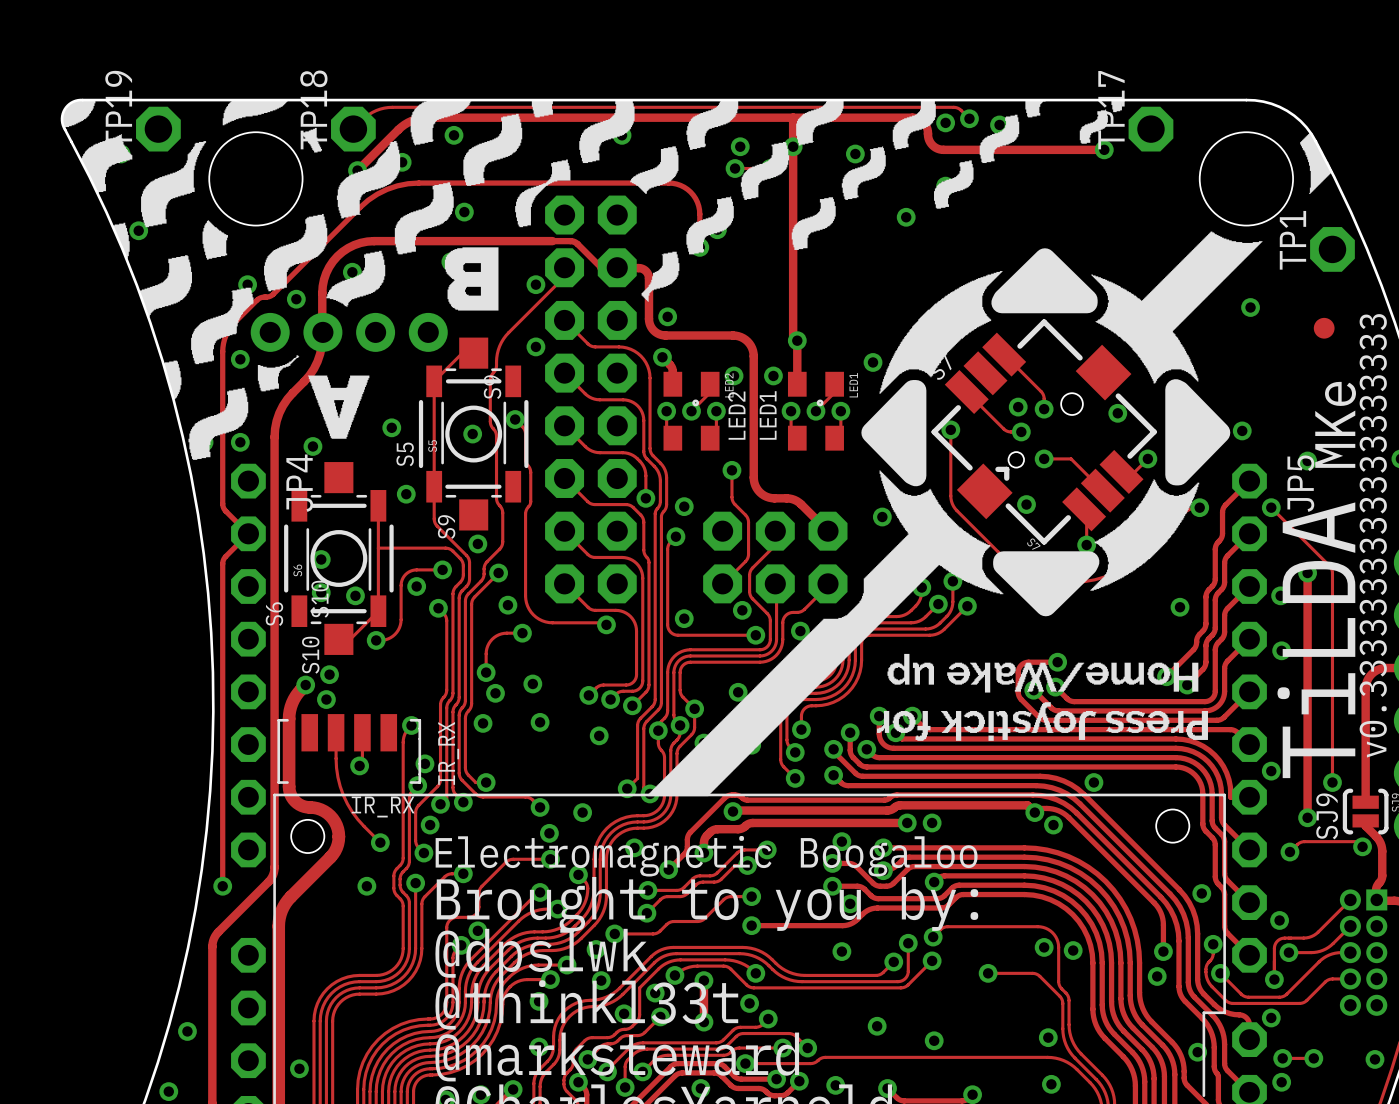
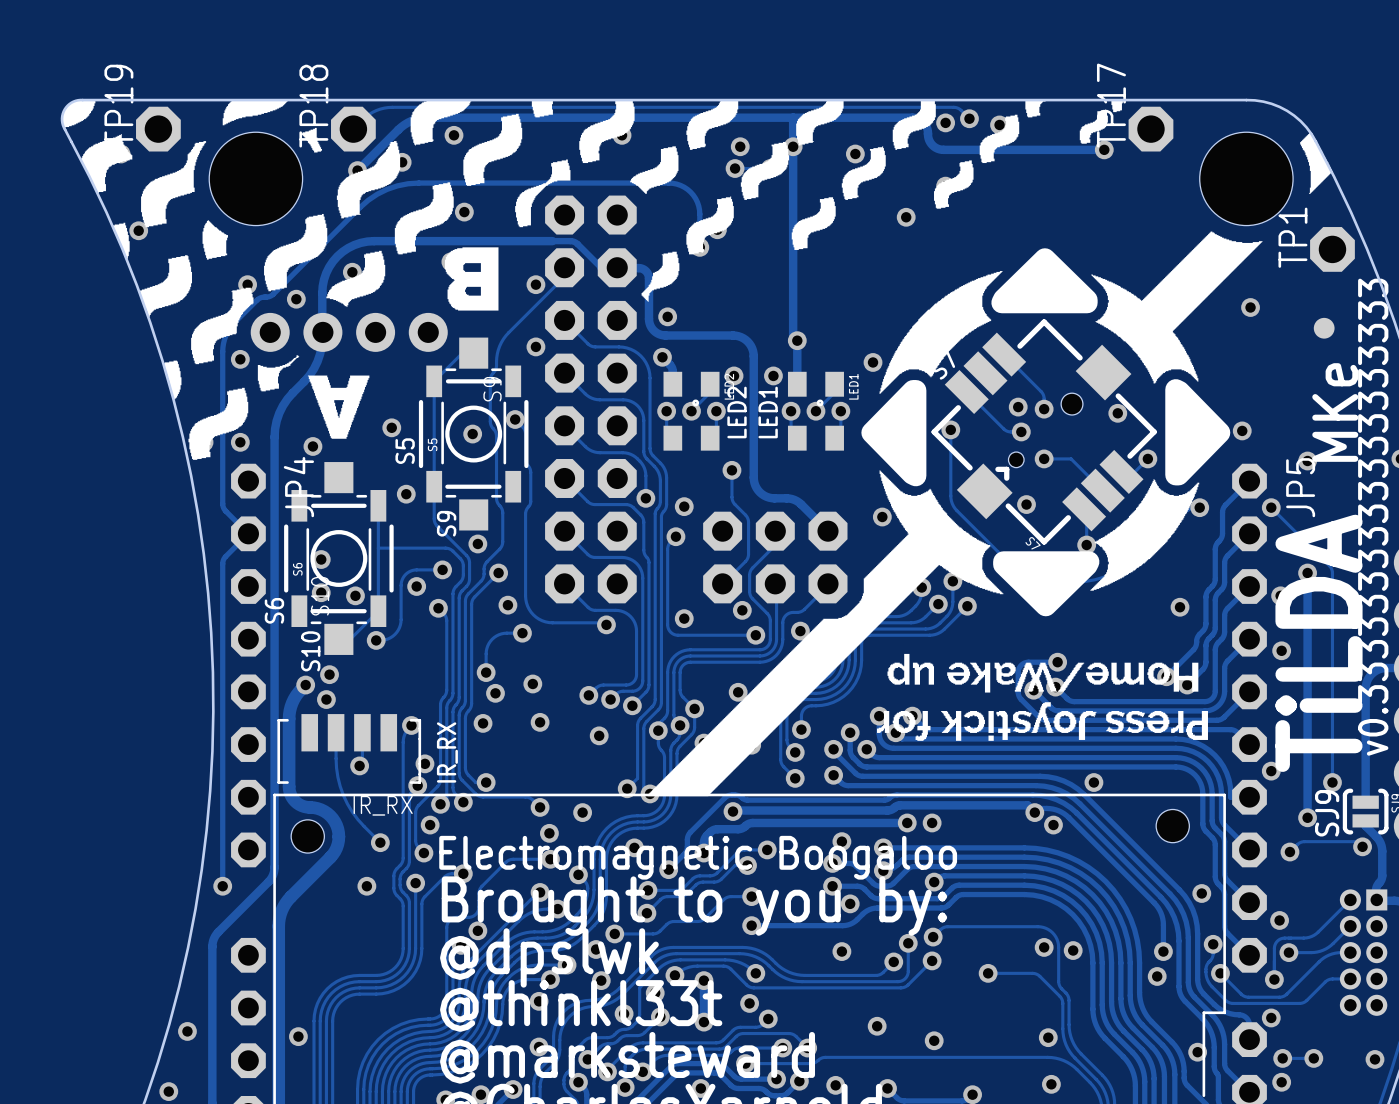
via position: (299, 1068) -> (298, 1036)

